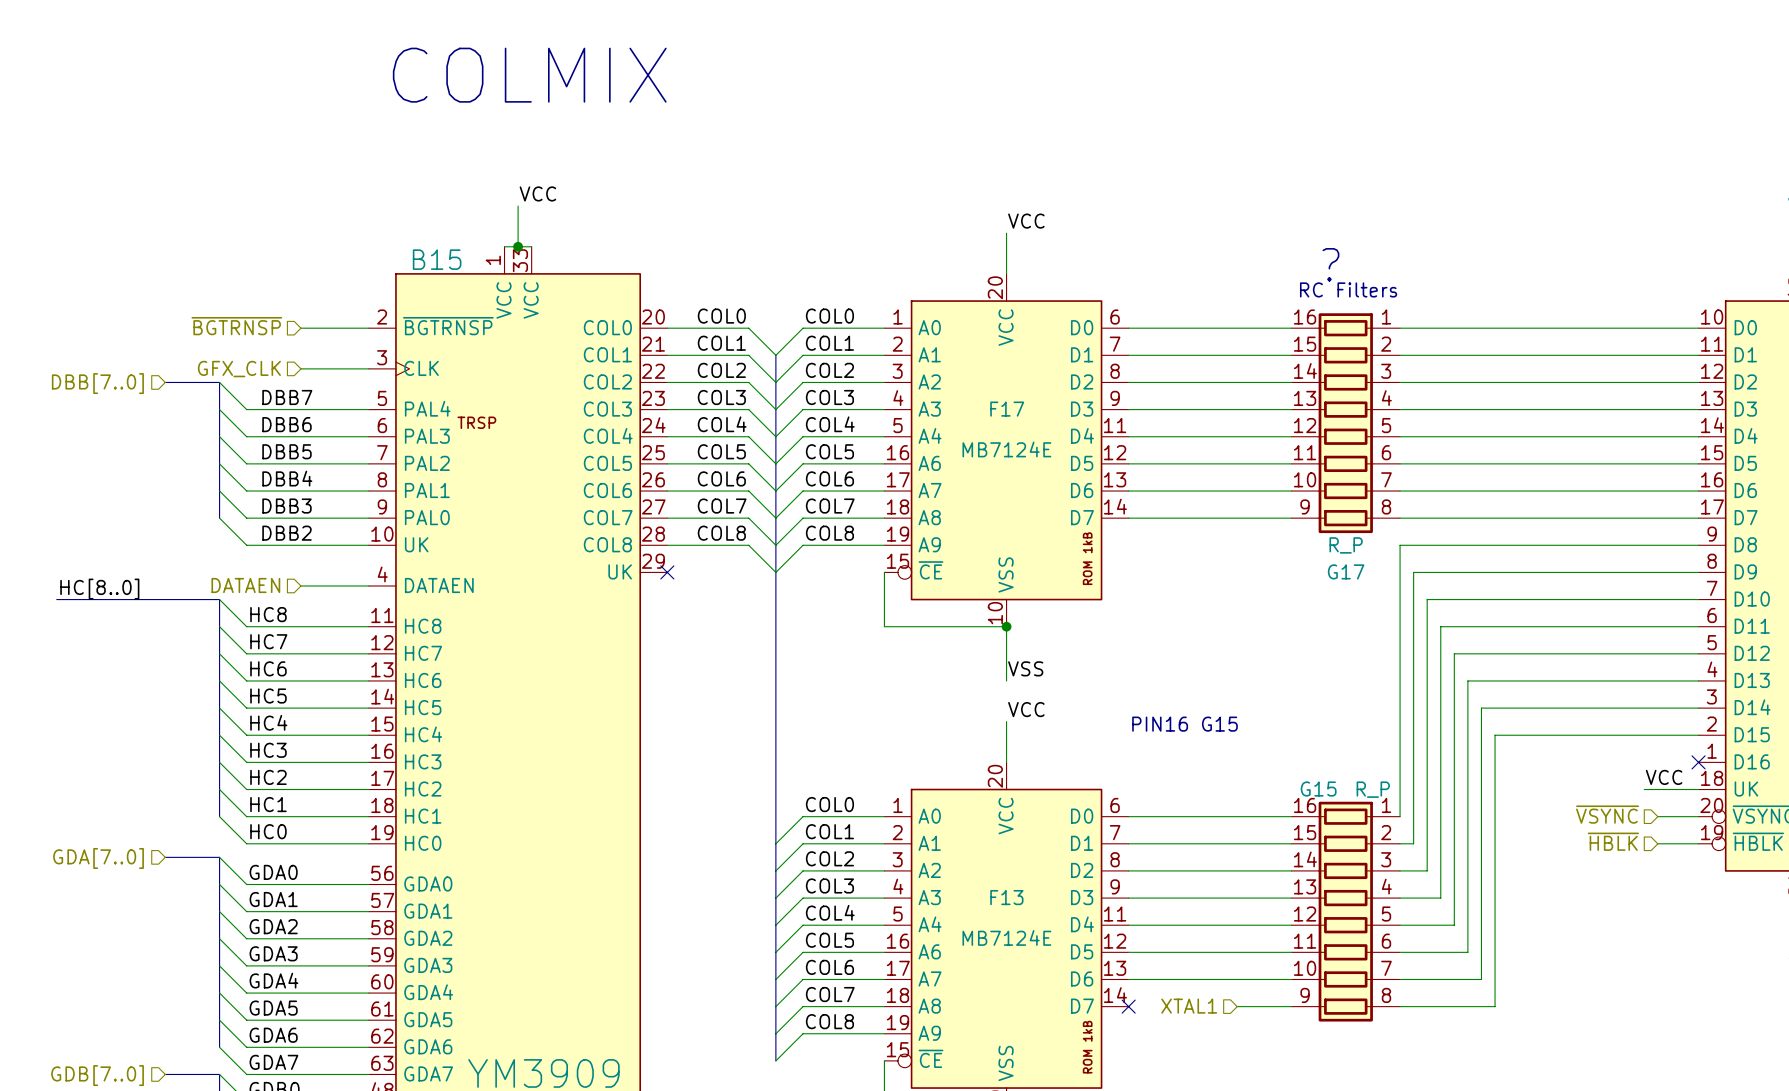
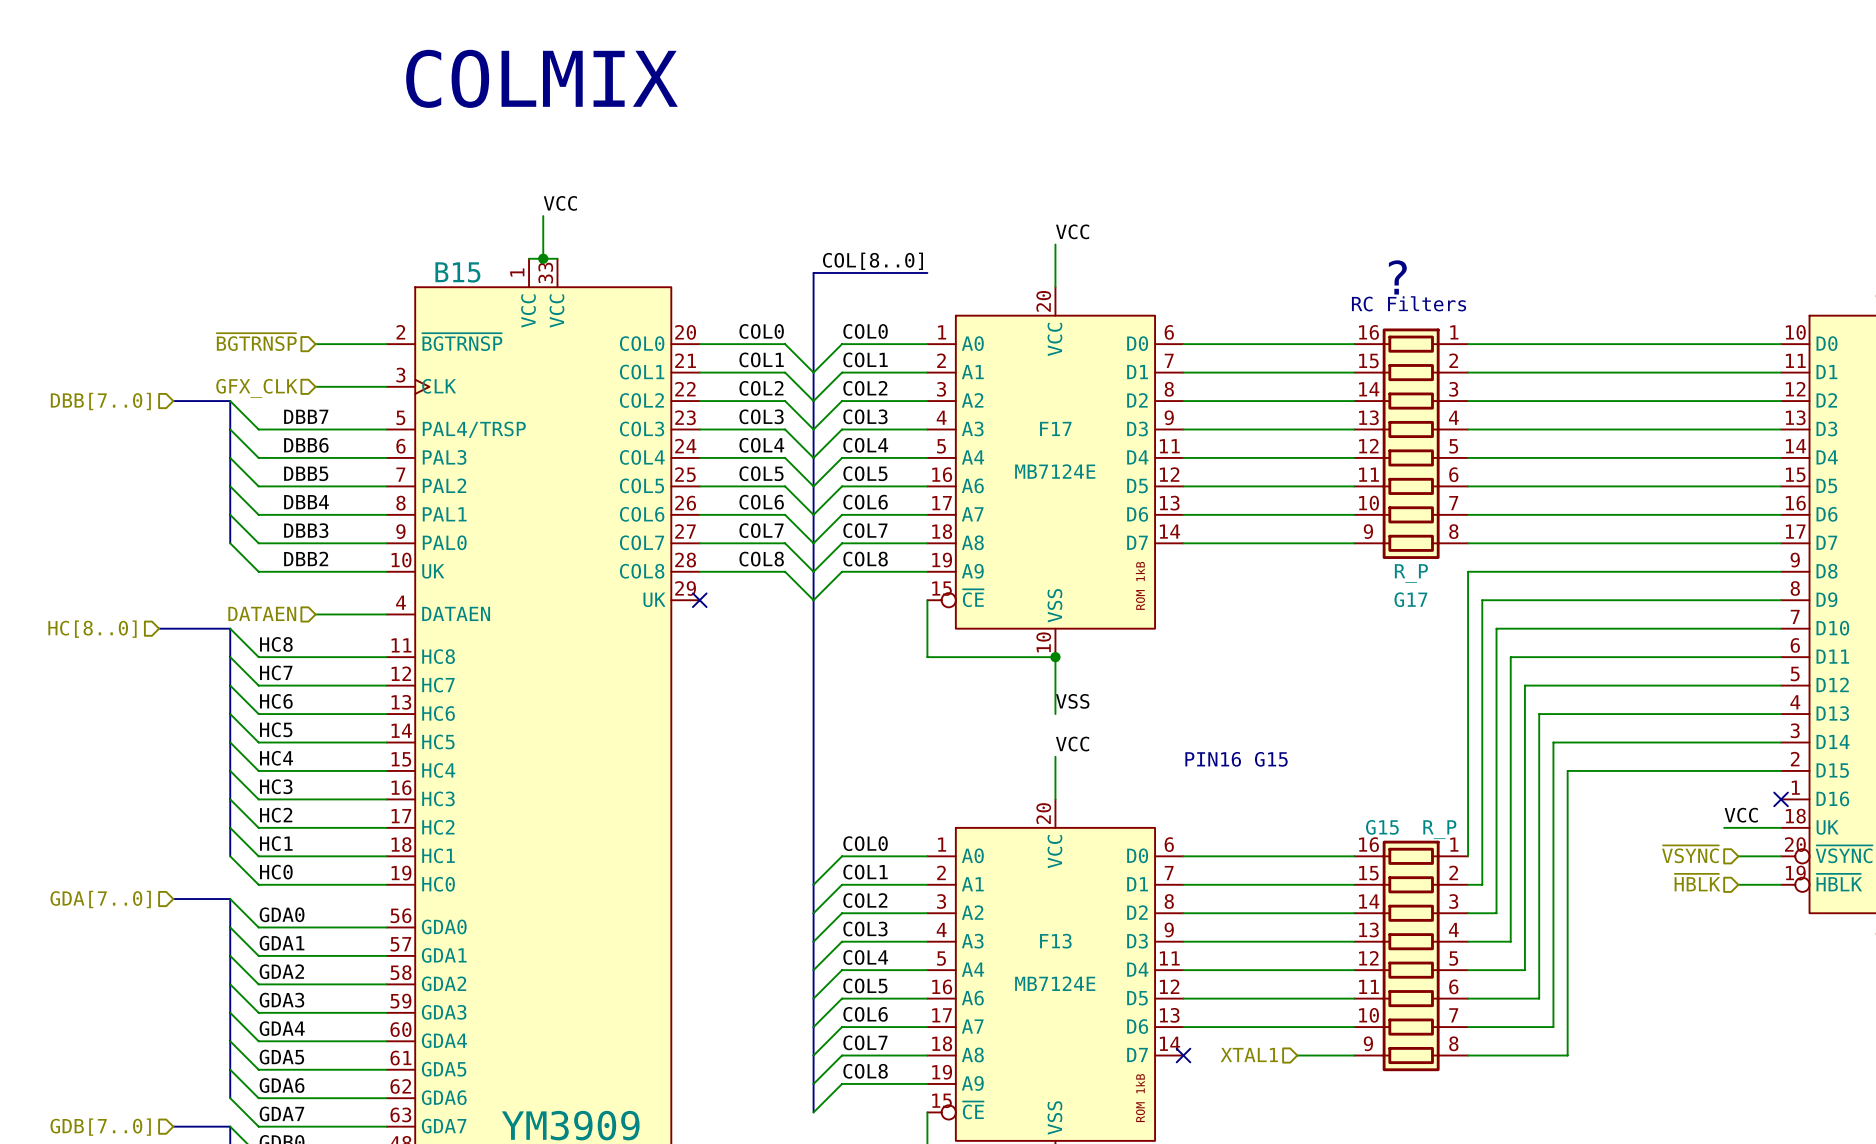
label: none -> COL[8..0] (872, 261)
bus: none -> (927, 272) (813, 272) (813, 372)
B15 pin name: PAL4 (427, 408) -> PAL4/TRSP (474, 429)
B15 text: TRSP (476, 422) -> none
label: HC[8..0] (99, 589) -> none
bus: (56, 599) (151, 599) -> none
hierarchical label: none -> HC[8..0] (92, 629)

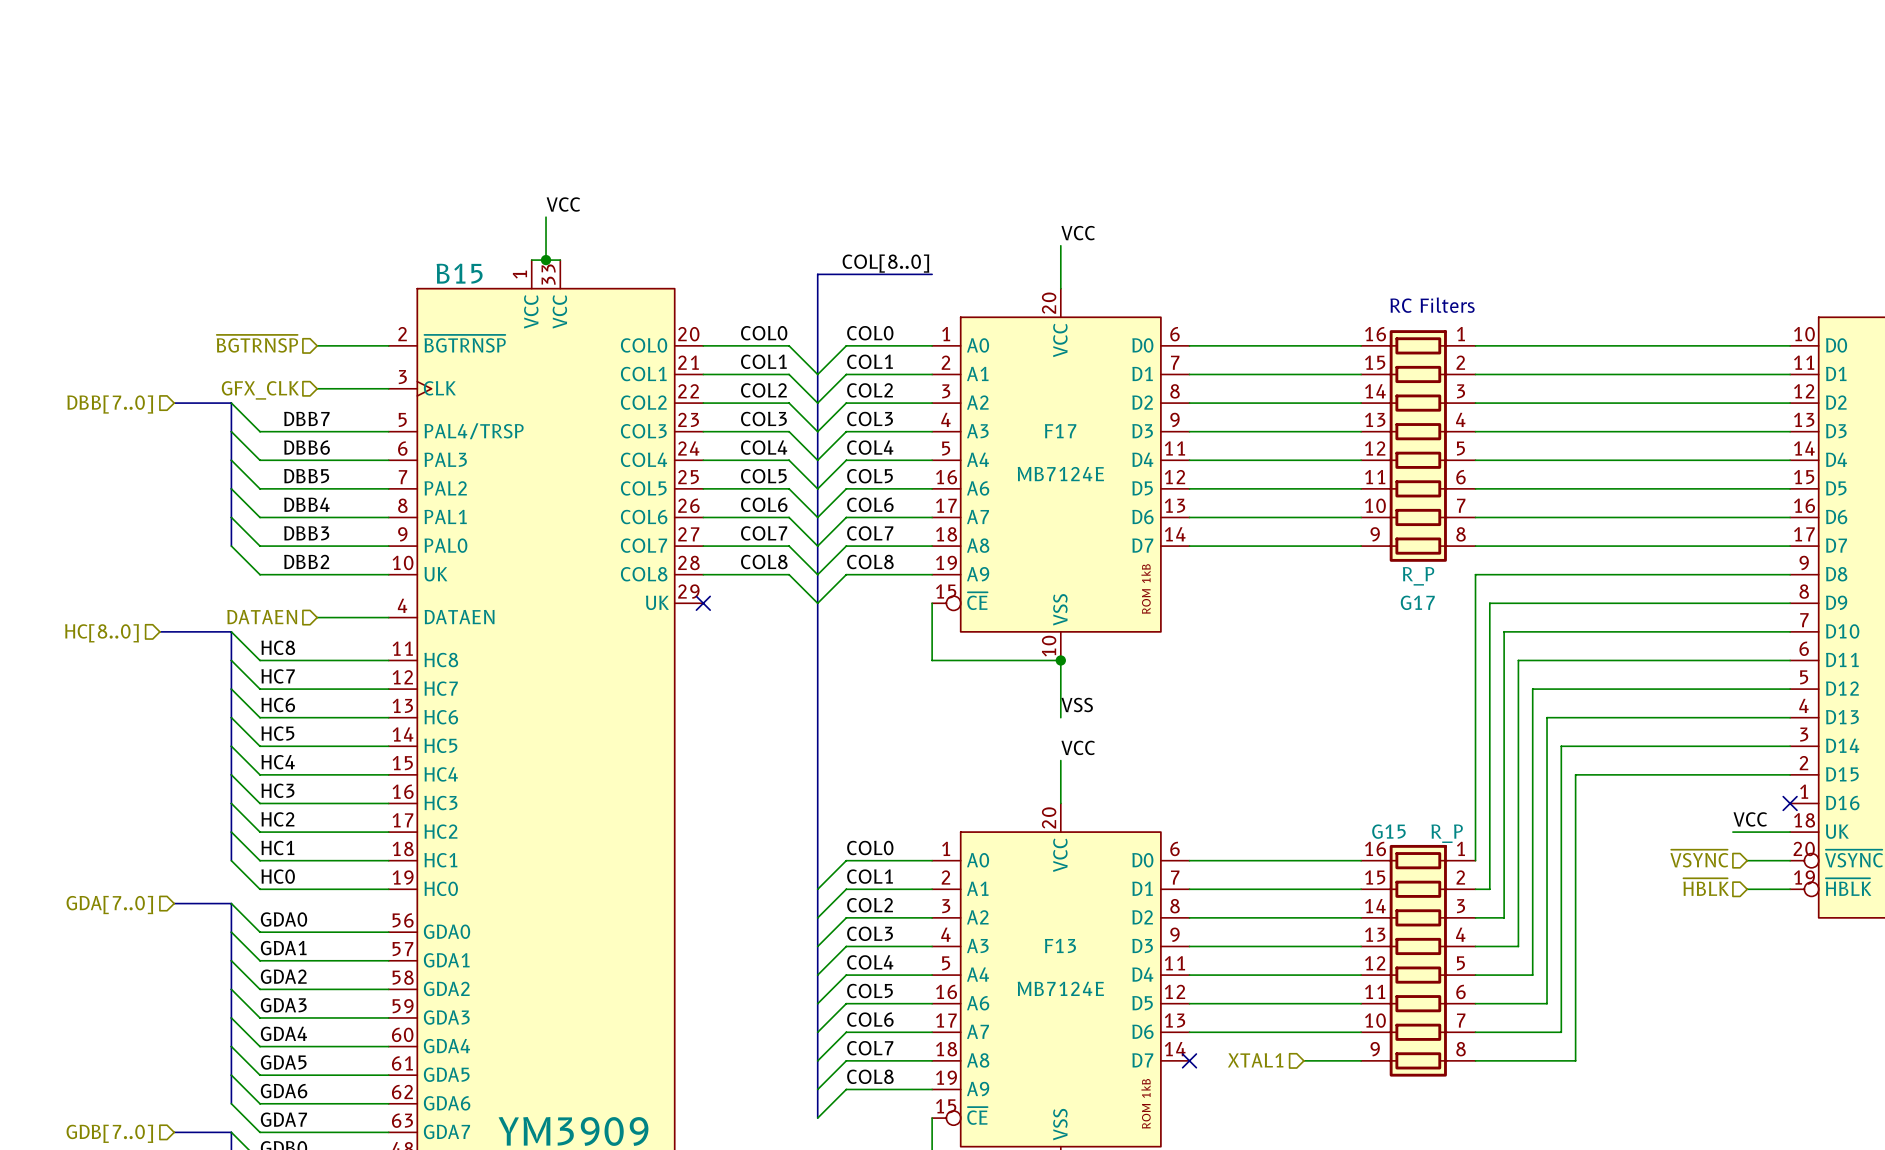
text: COLMIX (541, 78) -> none
text: ? (1397, 277) -> none
text: PIN16 G15 (1236, 759) -> none

